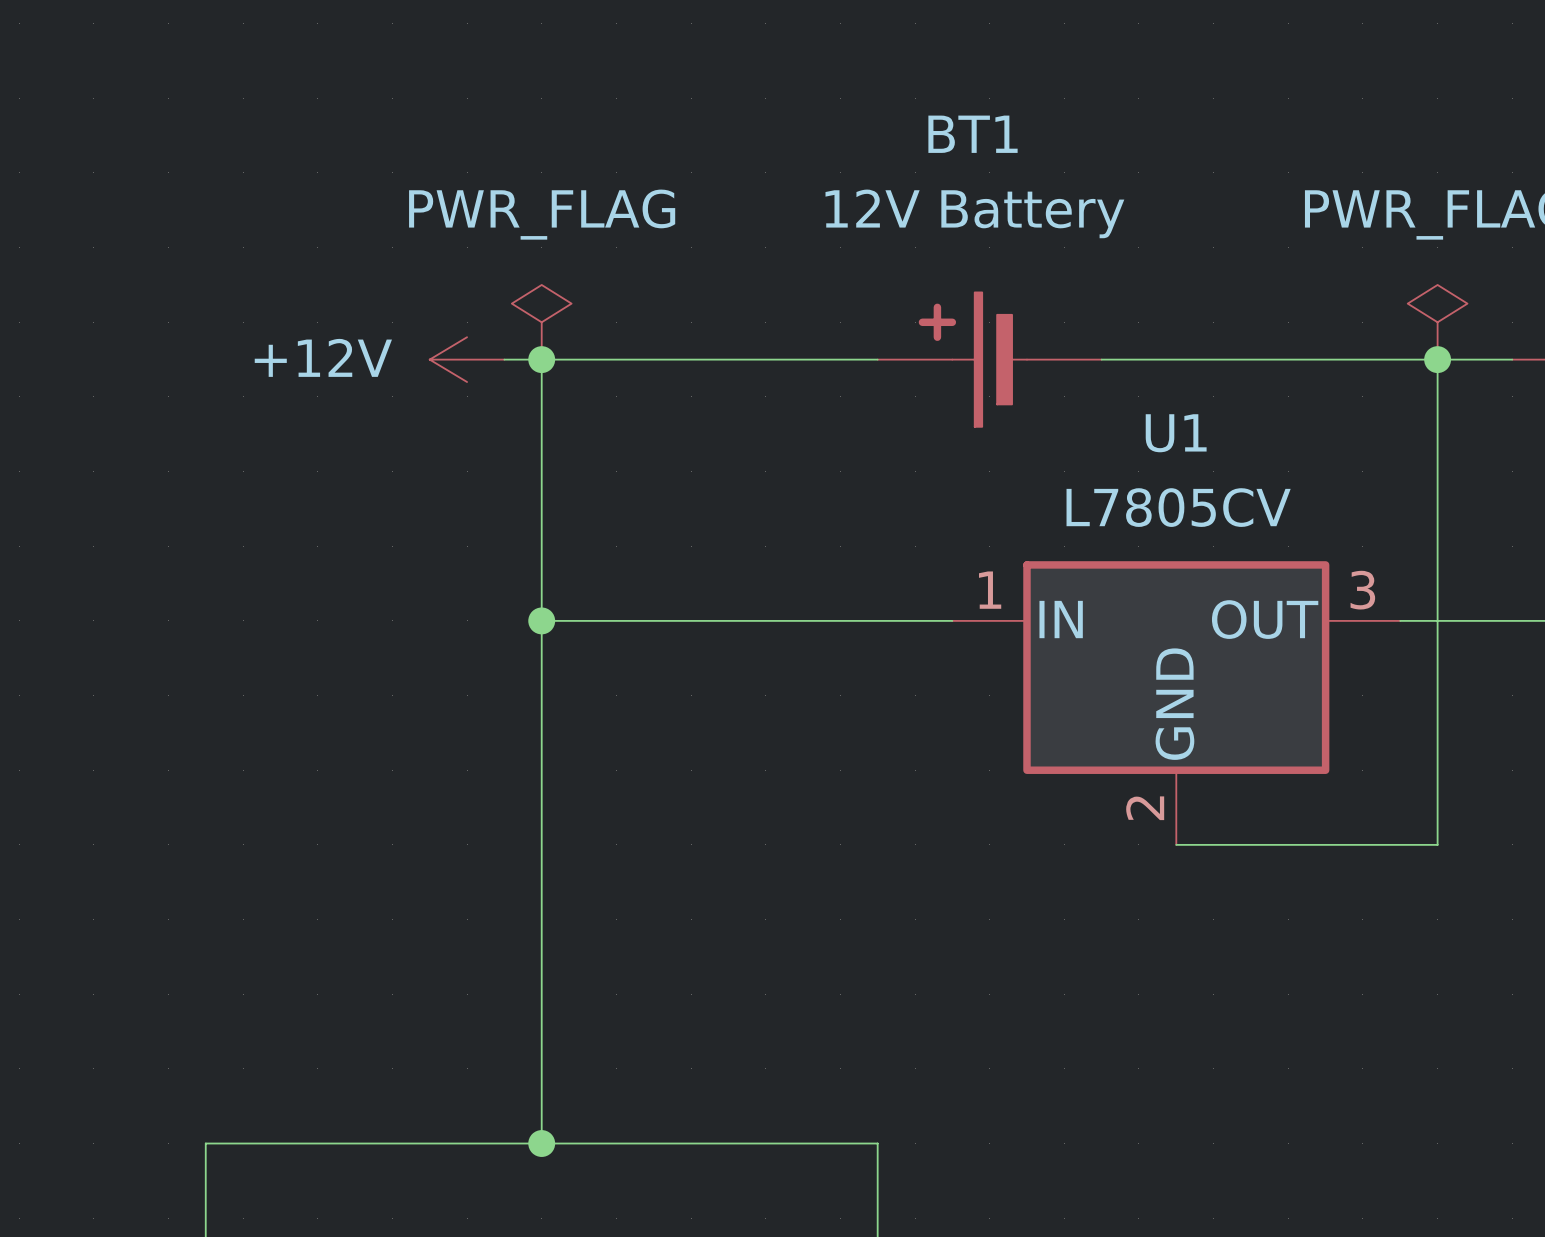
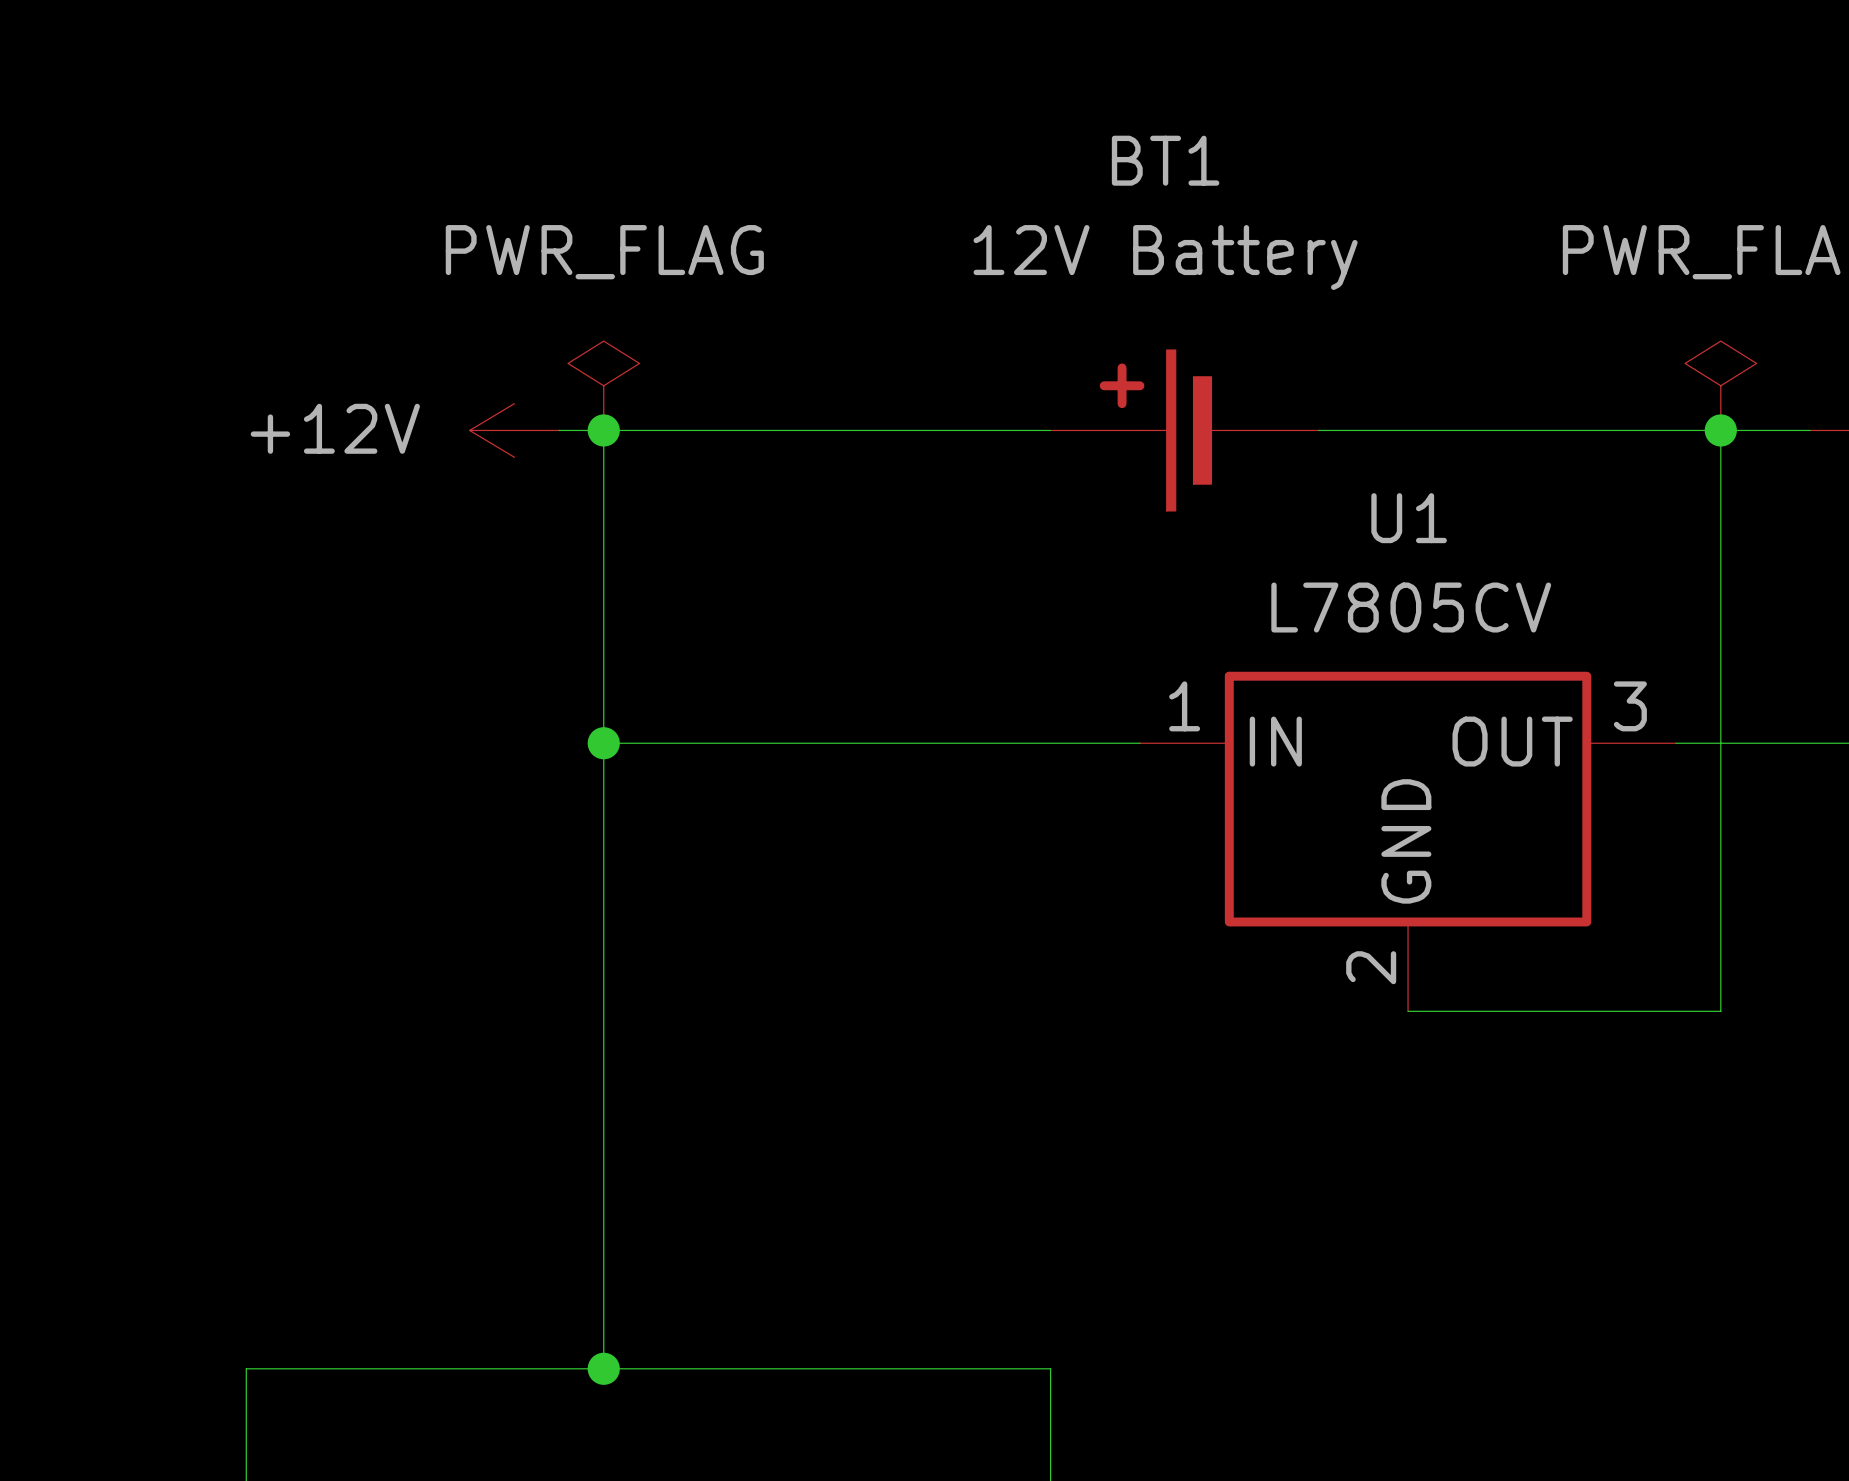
power symbol position: PWR_FLAG (541, 322) -> PWR_FLAG (603, 385)
wire: none -> (559, 430) (603, 430) (603, 1368)
power symbol position: +12V (467, 359) -> +12V (514, 430)
wire: (541, 359) (541, 1143) -> none
junction position: (541, 359) -> (603, 430)
wire: none -> (603, 743) (648, 743)
junction position: (541, 620) -> (603, 743)
junction position: (541, 1143) -> (603, 1368)

